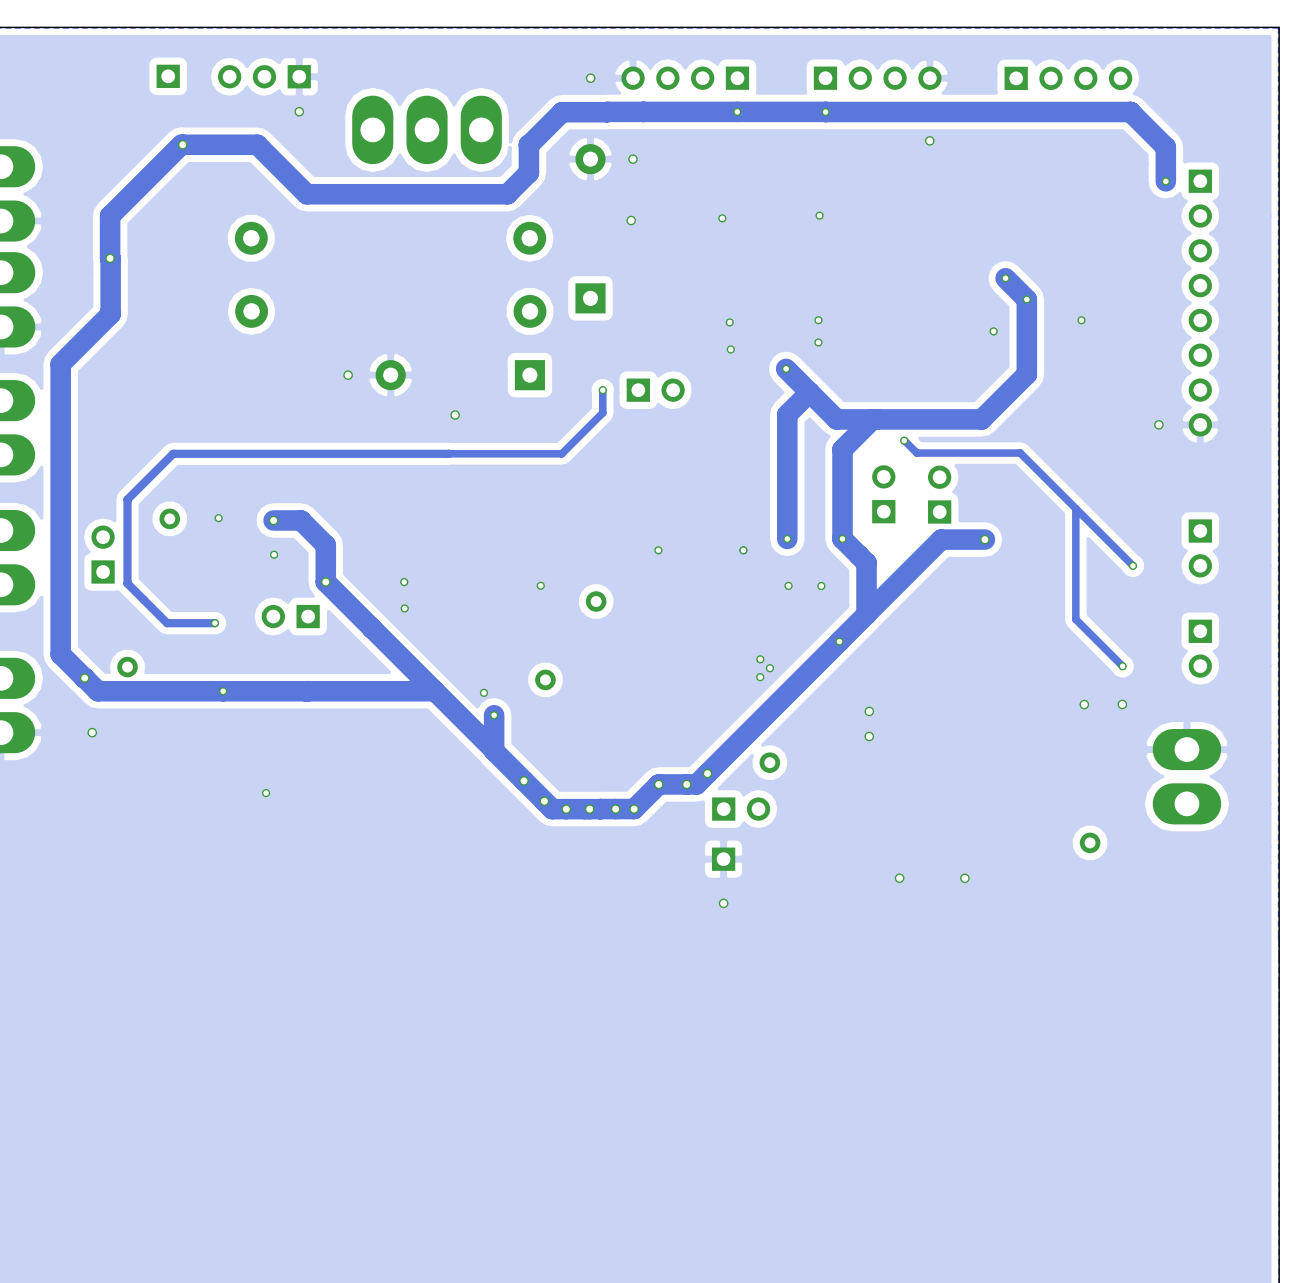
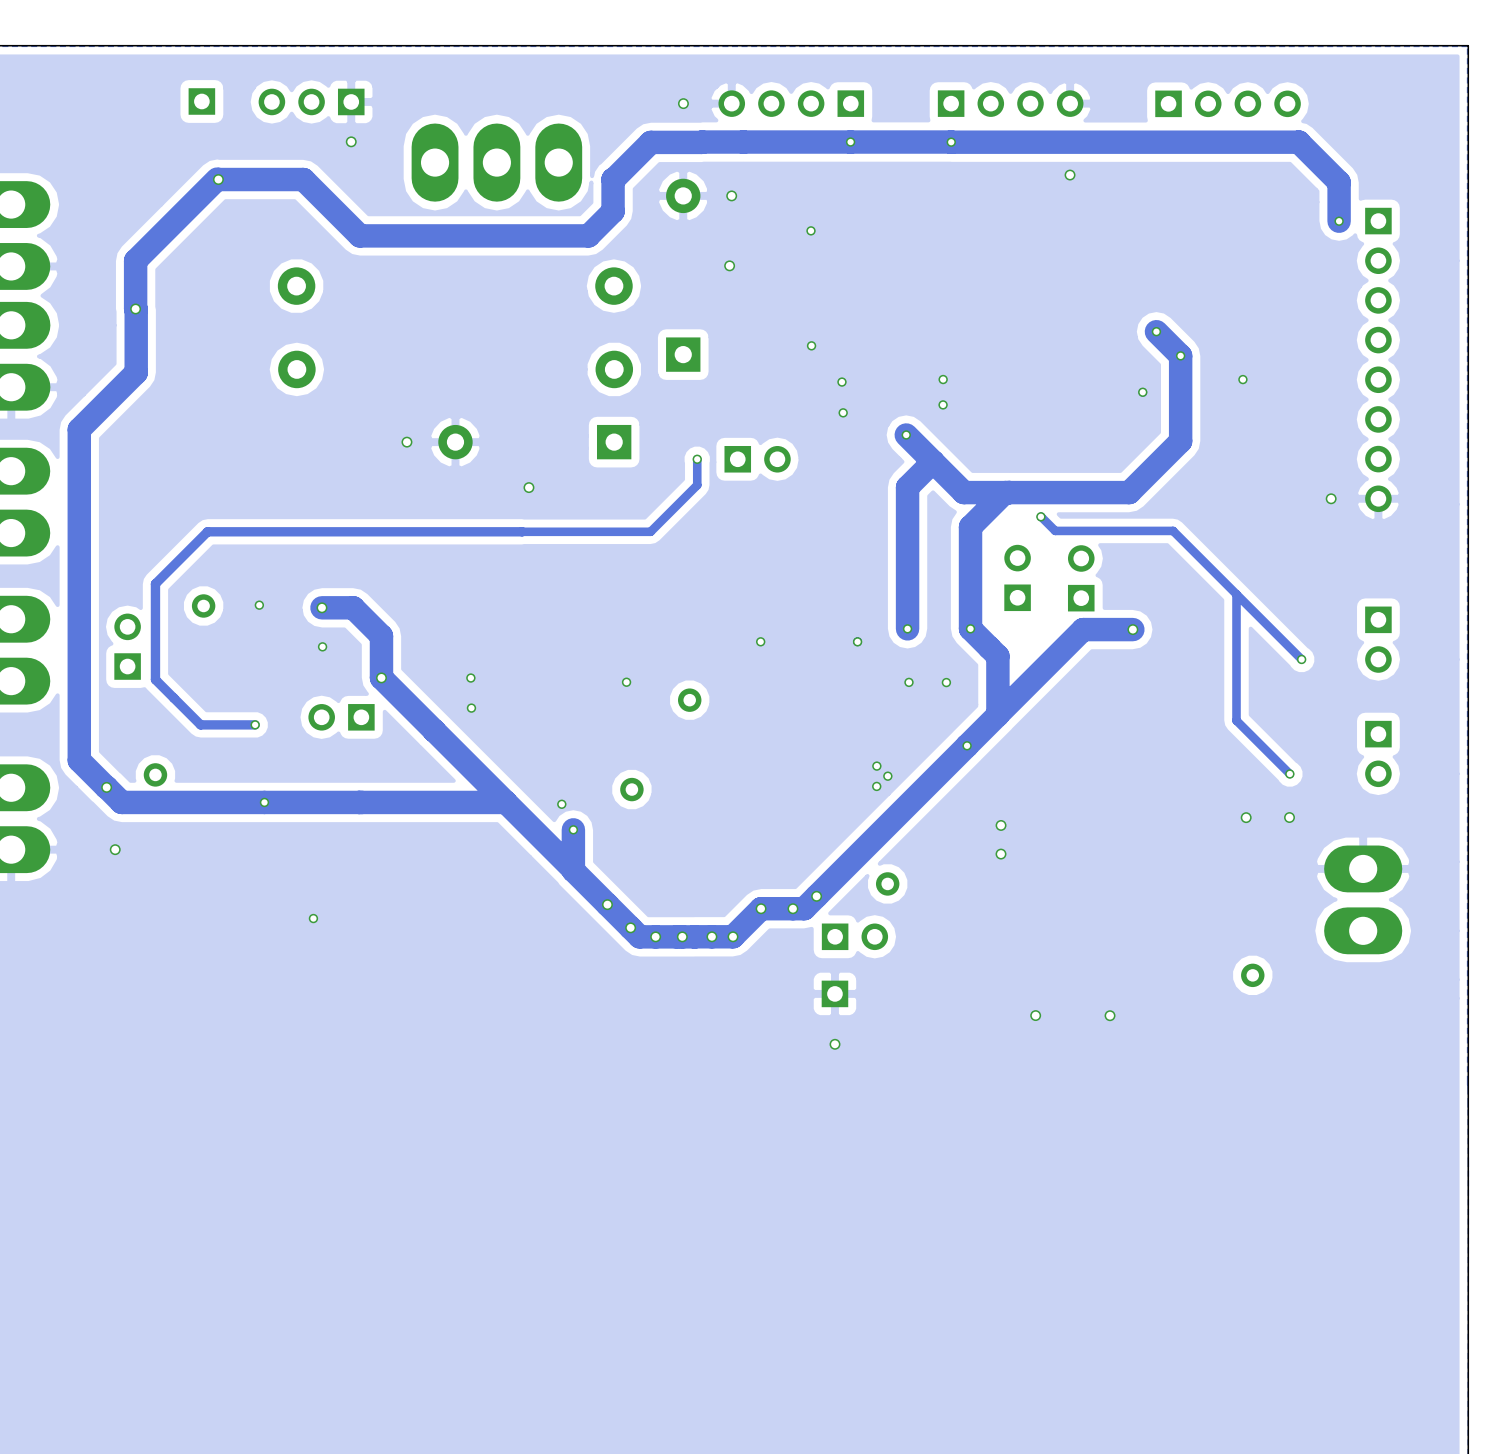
via: (819, 215) -> none
via position: (722, 218) -> (811, 230)
via: none -> (811, 345)

